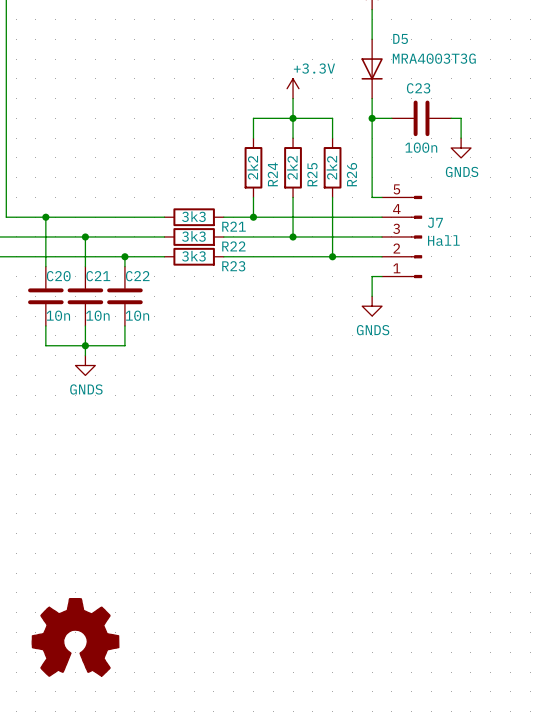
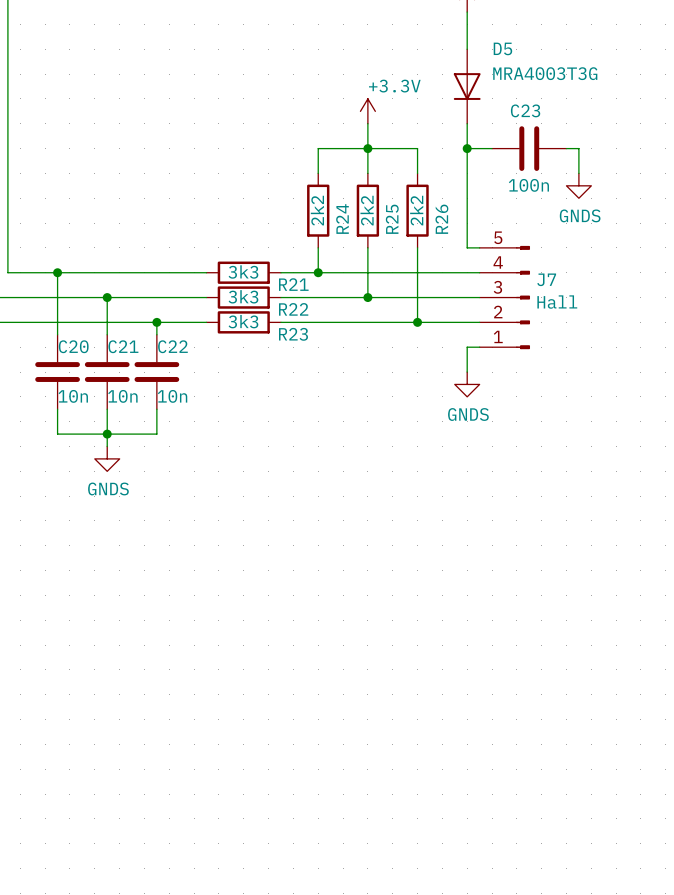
power symbol: (75, 637) -> none

